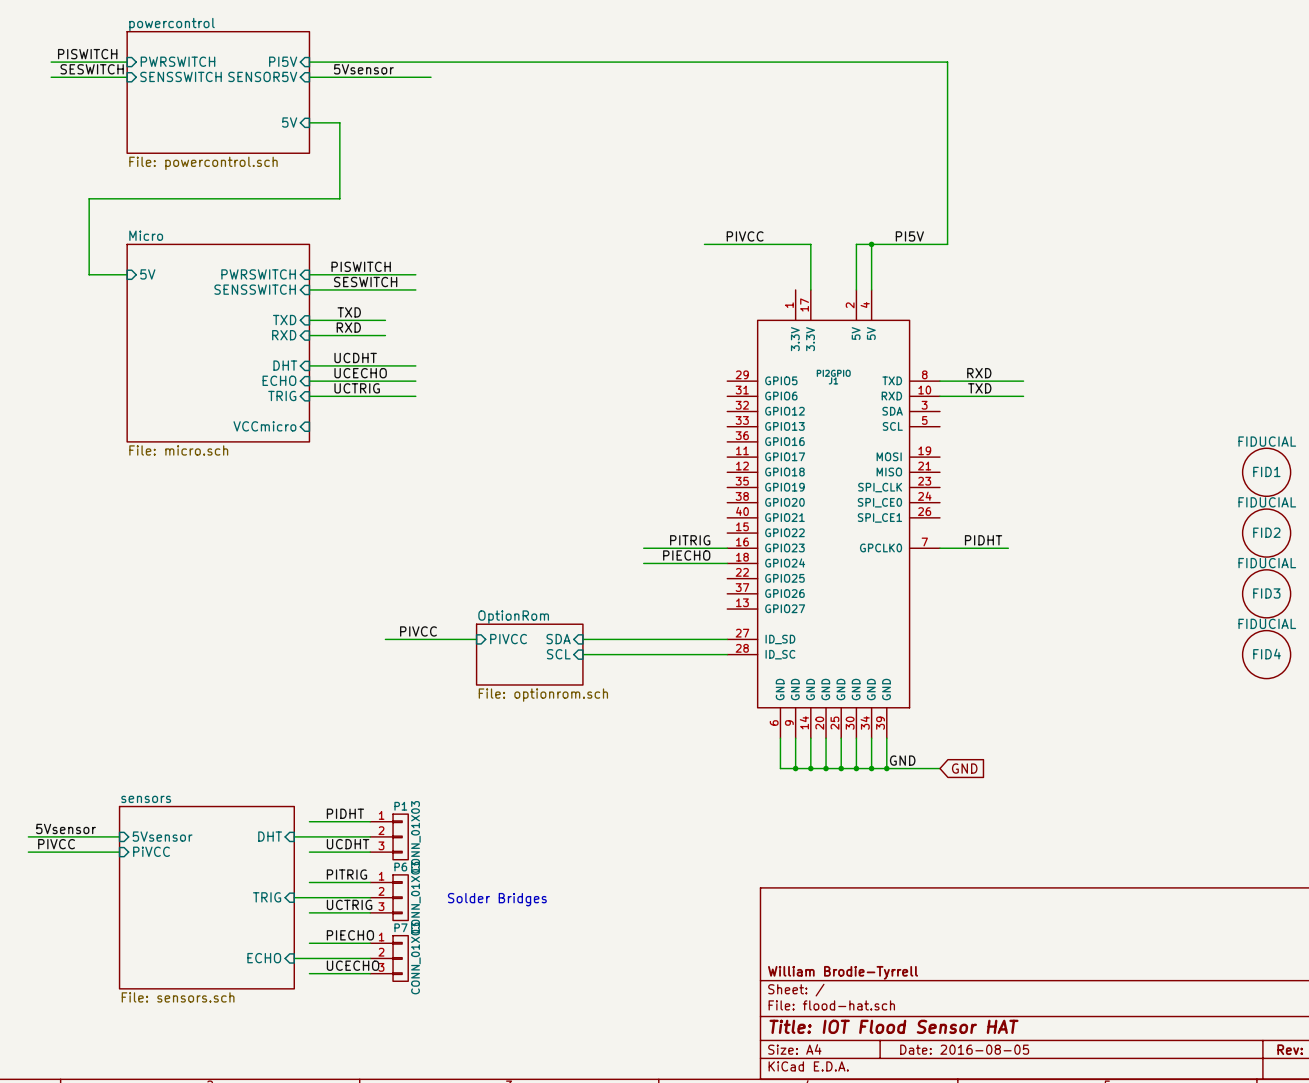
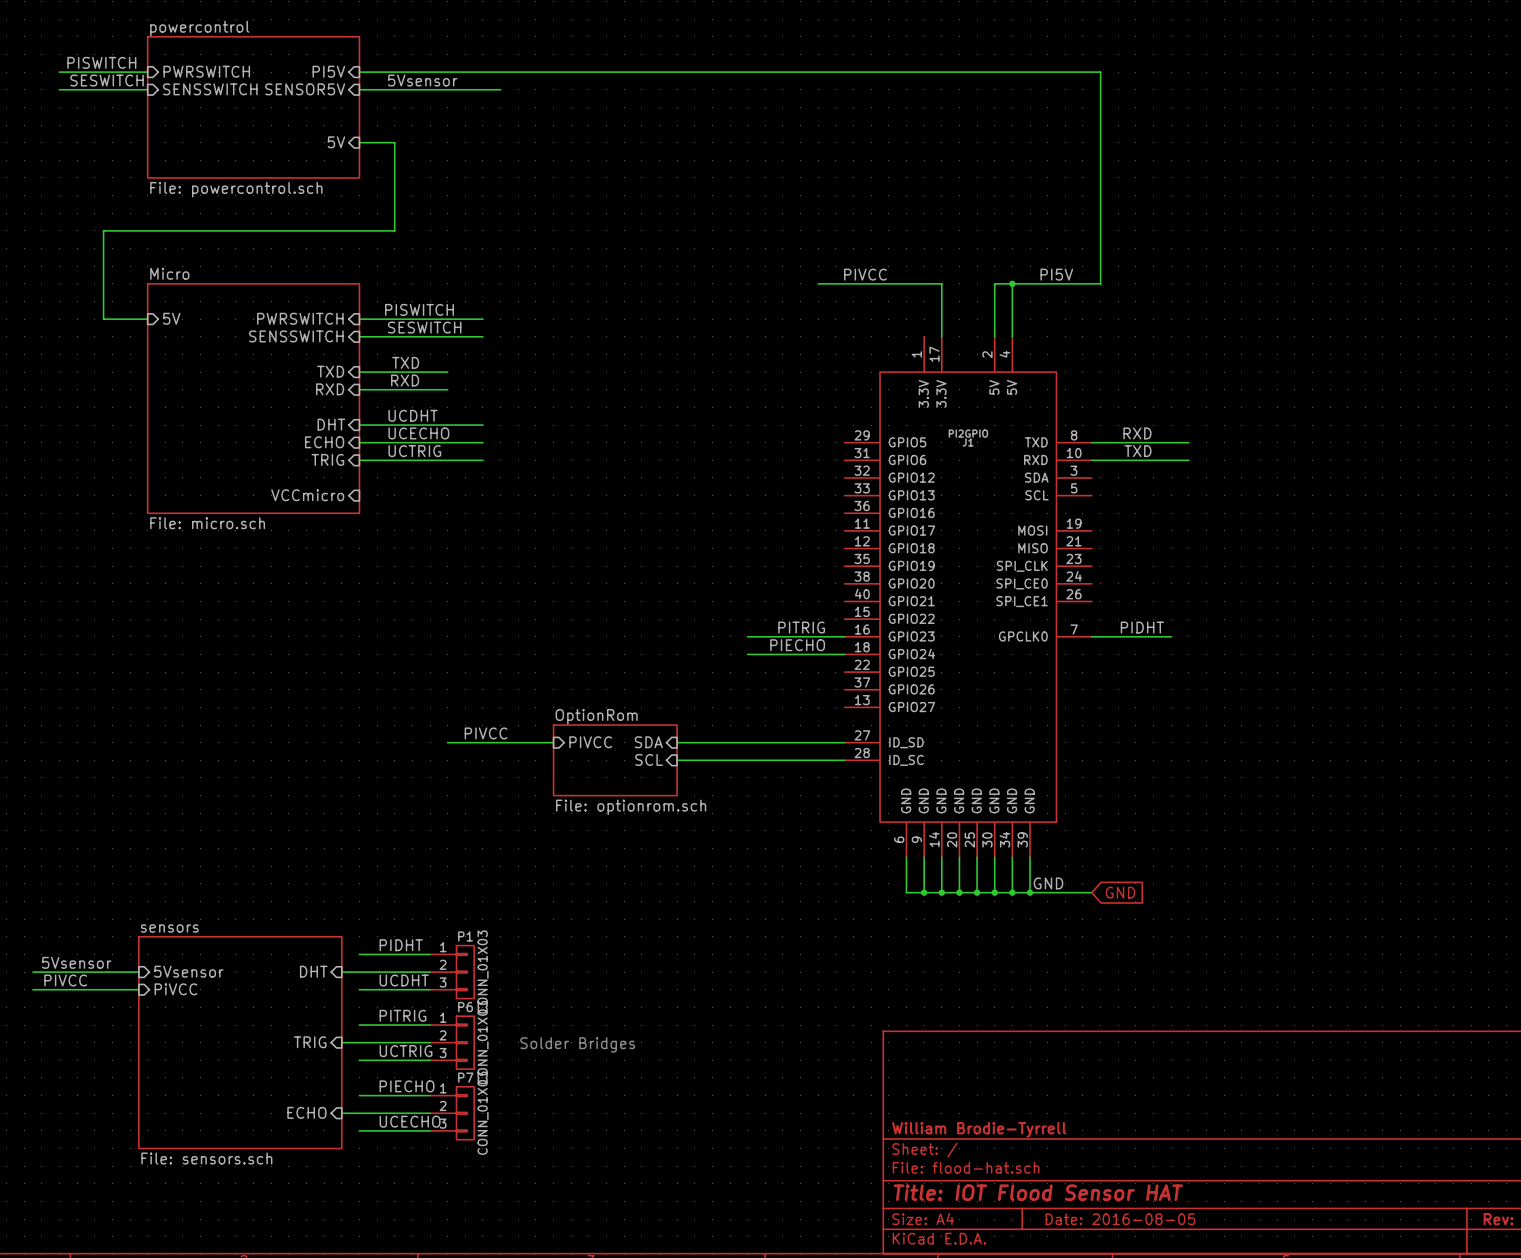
FID1: FIDUCIAL (1266, 472) -> none
FID2: FIDUCIAL (1266, 533) -> none
FID3: FIDUCIAL (1266, 593) -> none
FID4: FIDUCIAL (1266, 654) -> none

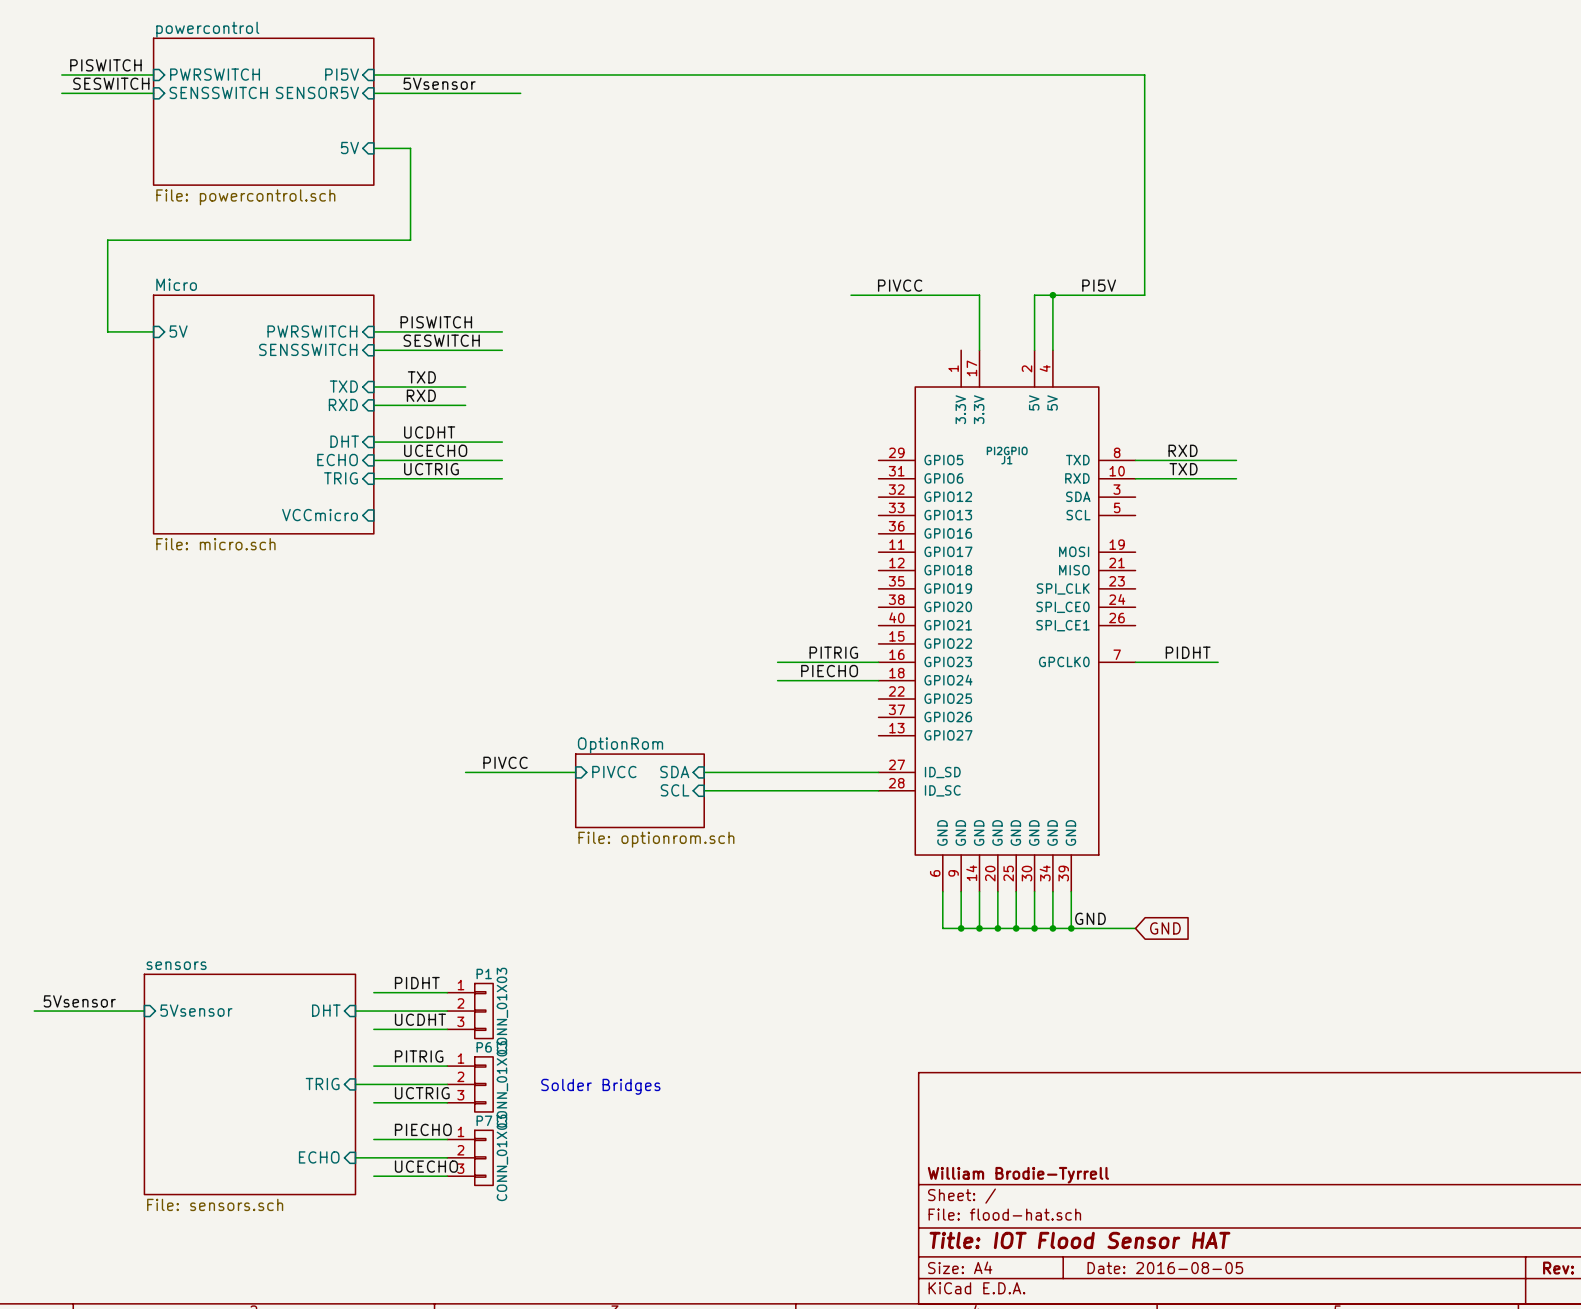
label: PIVCC (65, 980) -> none
wire: (32, 989) (138, 989) -> none
sheet pin: PiVCC (175, 989) -> none

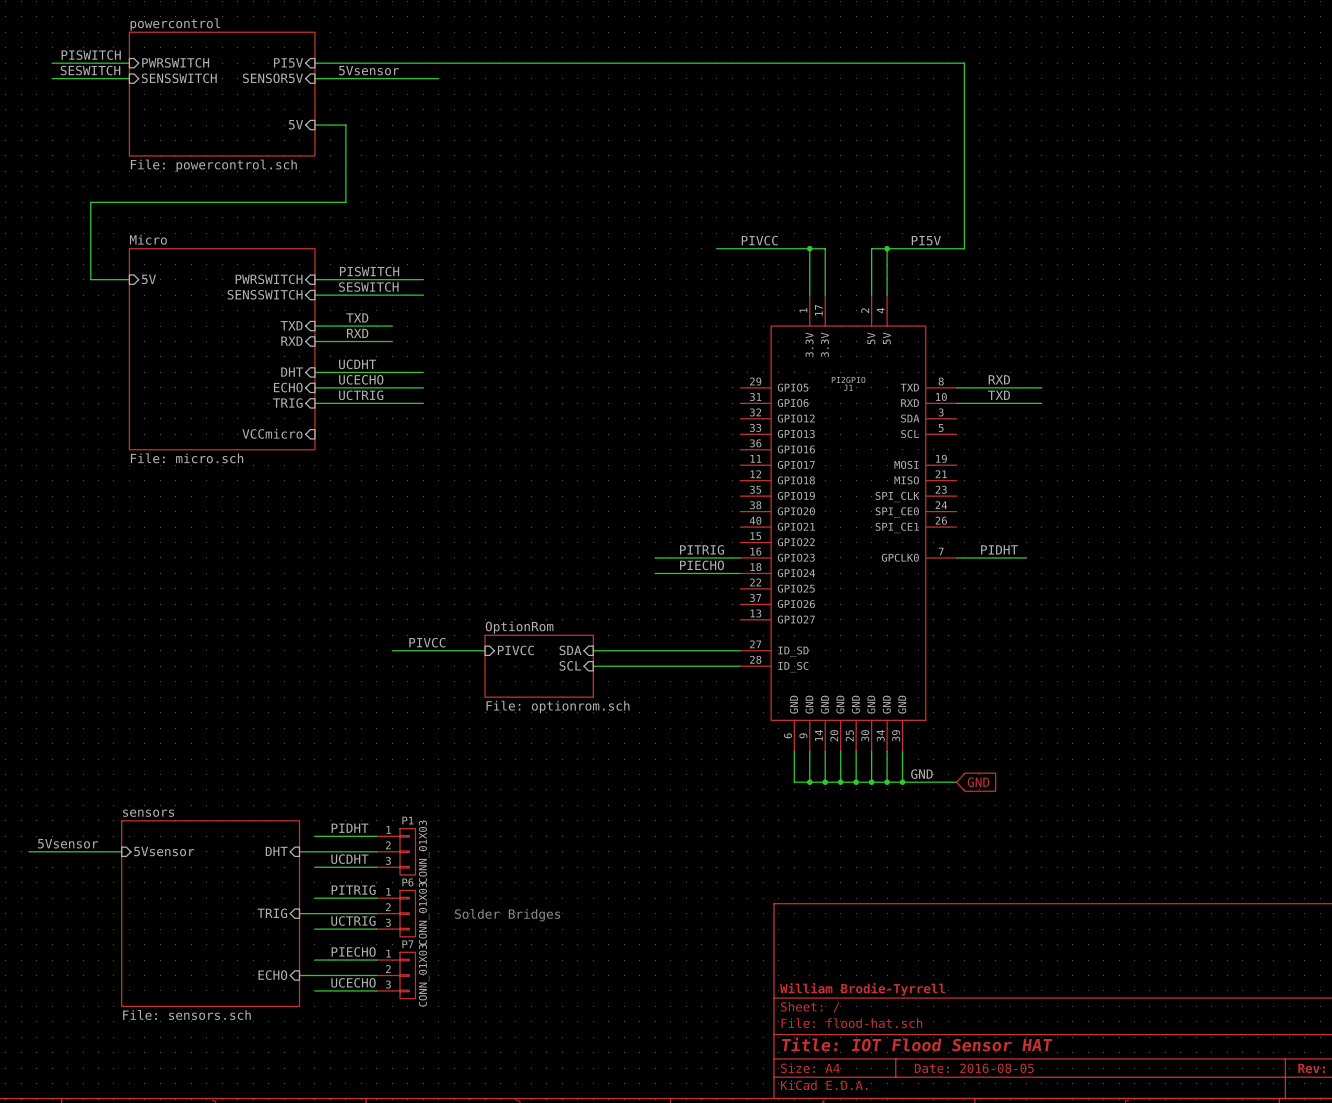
wire: none -> (809, 248) (809, 295)
junction: none -> (809, 248)

